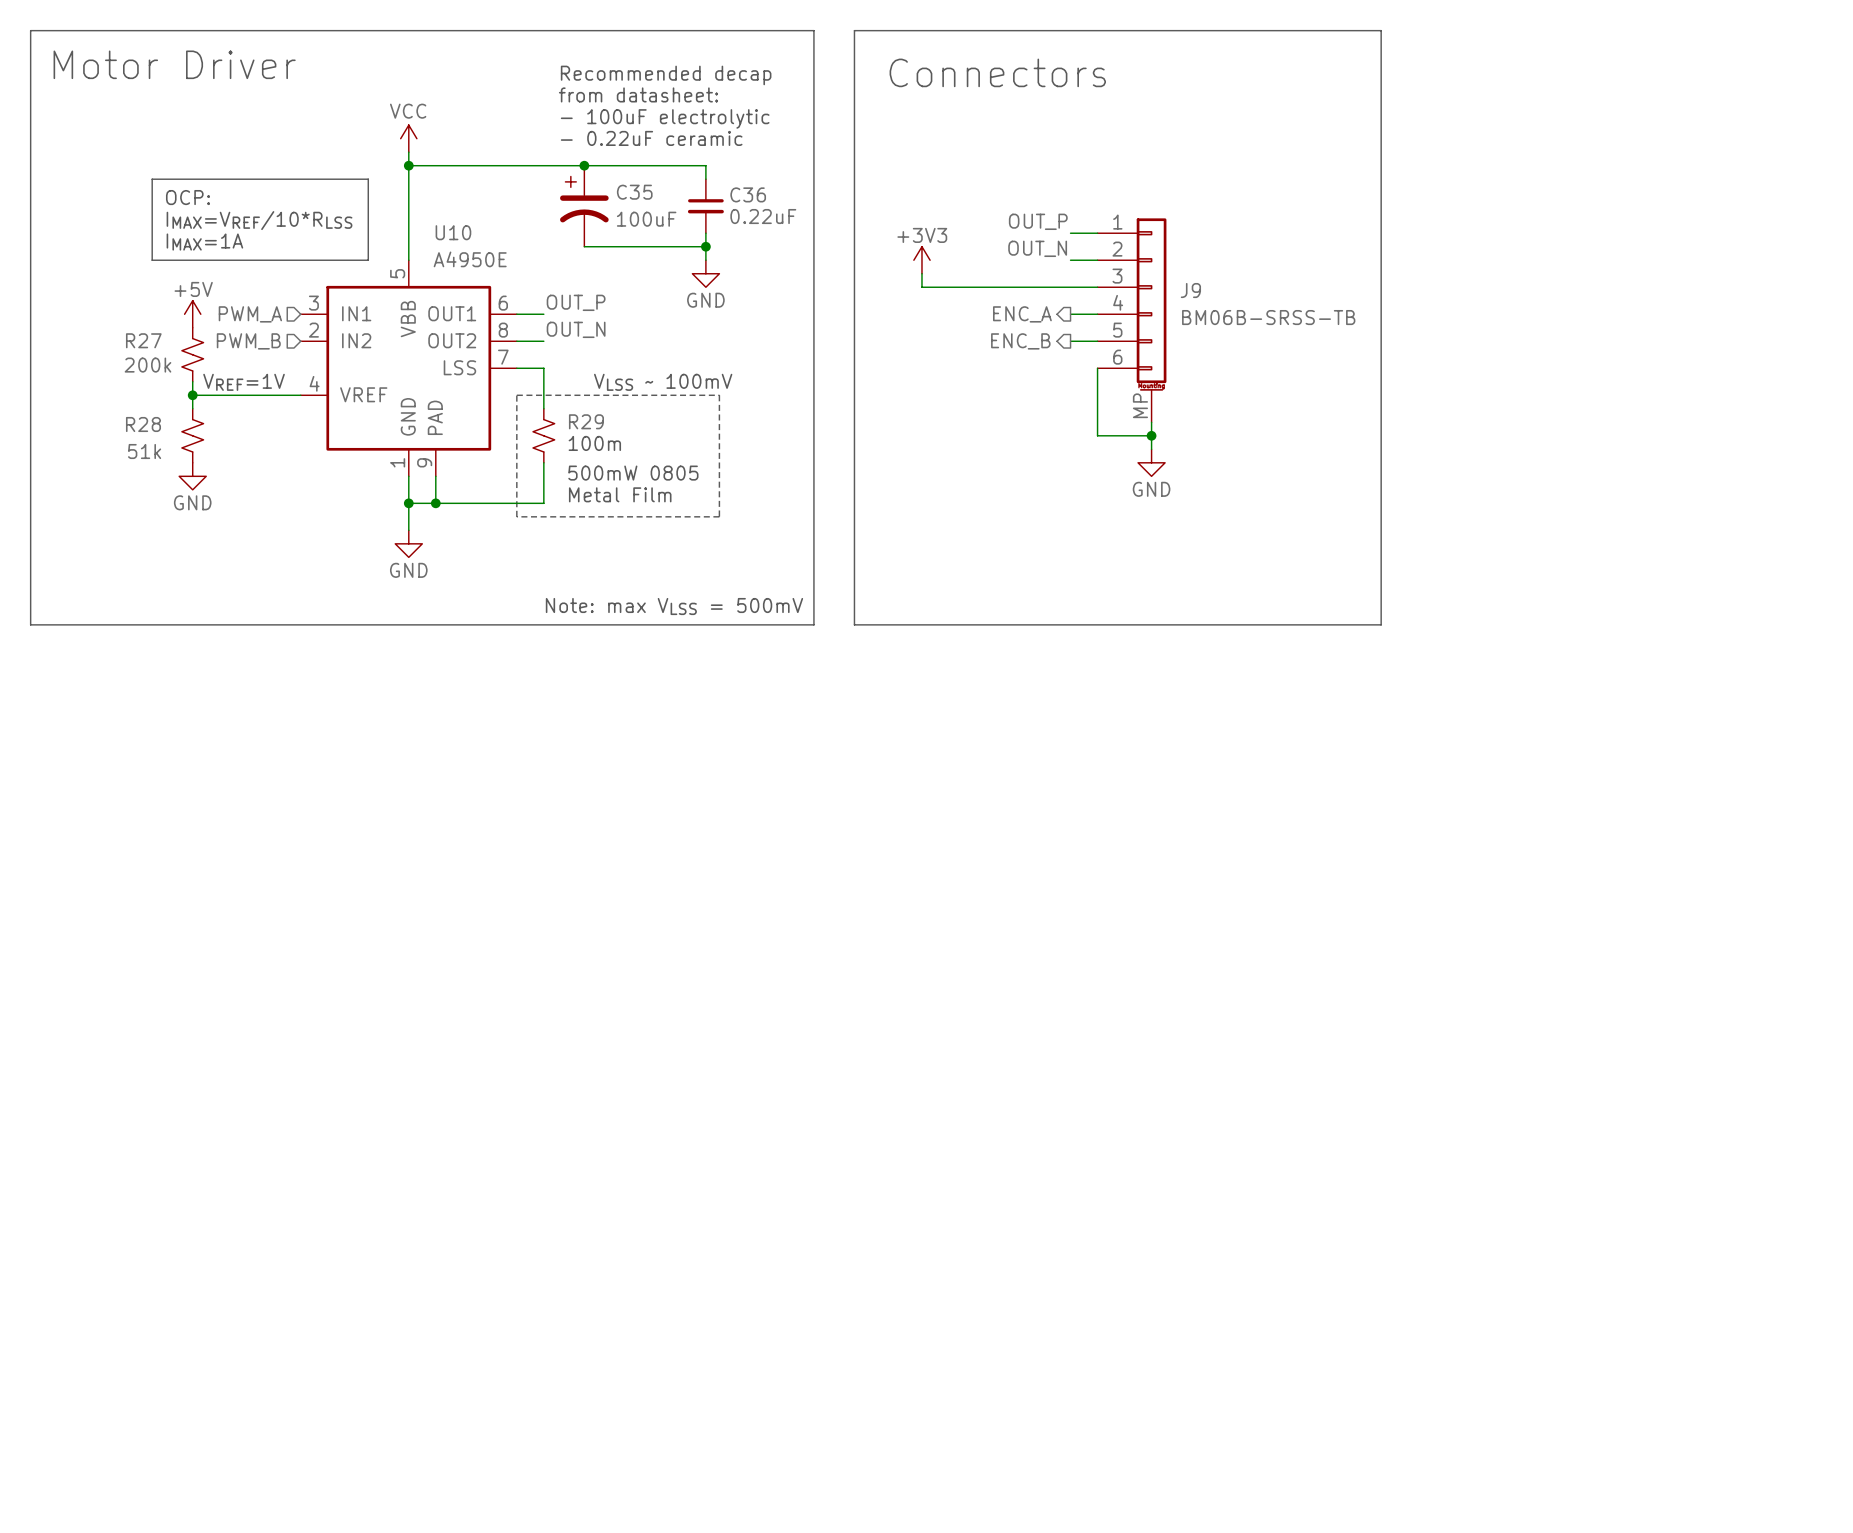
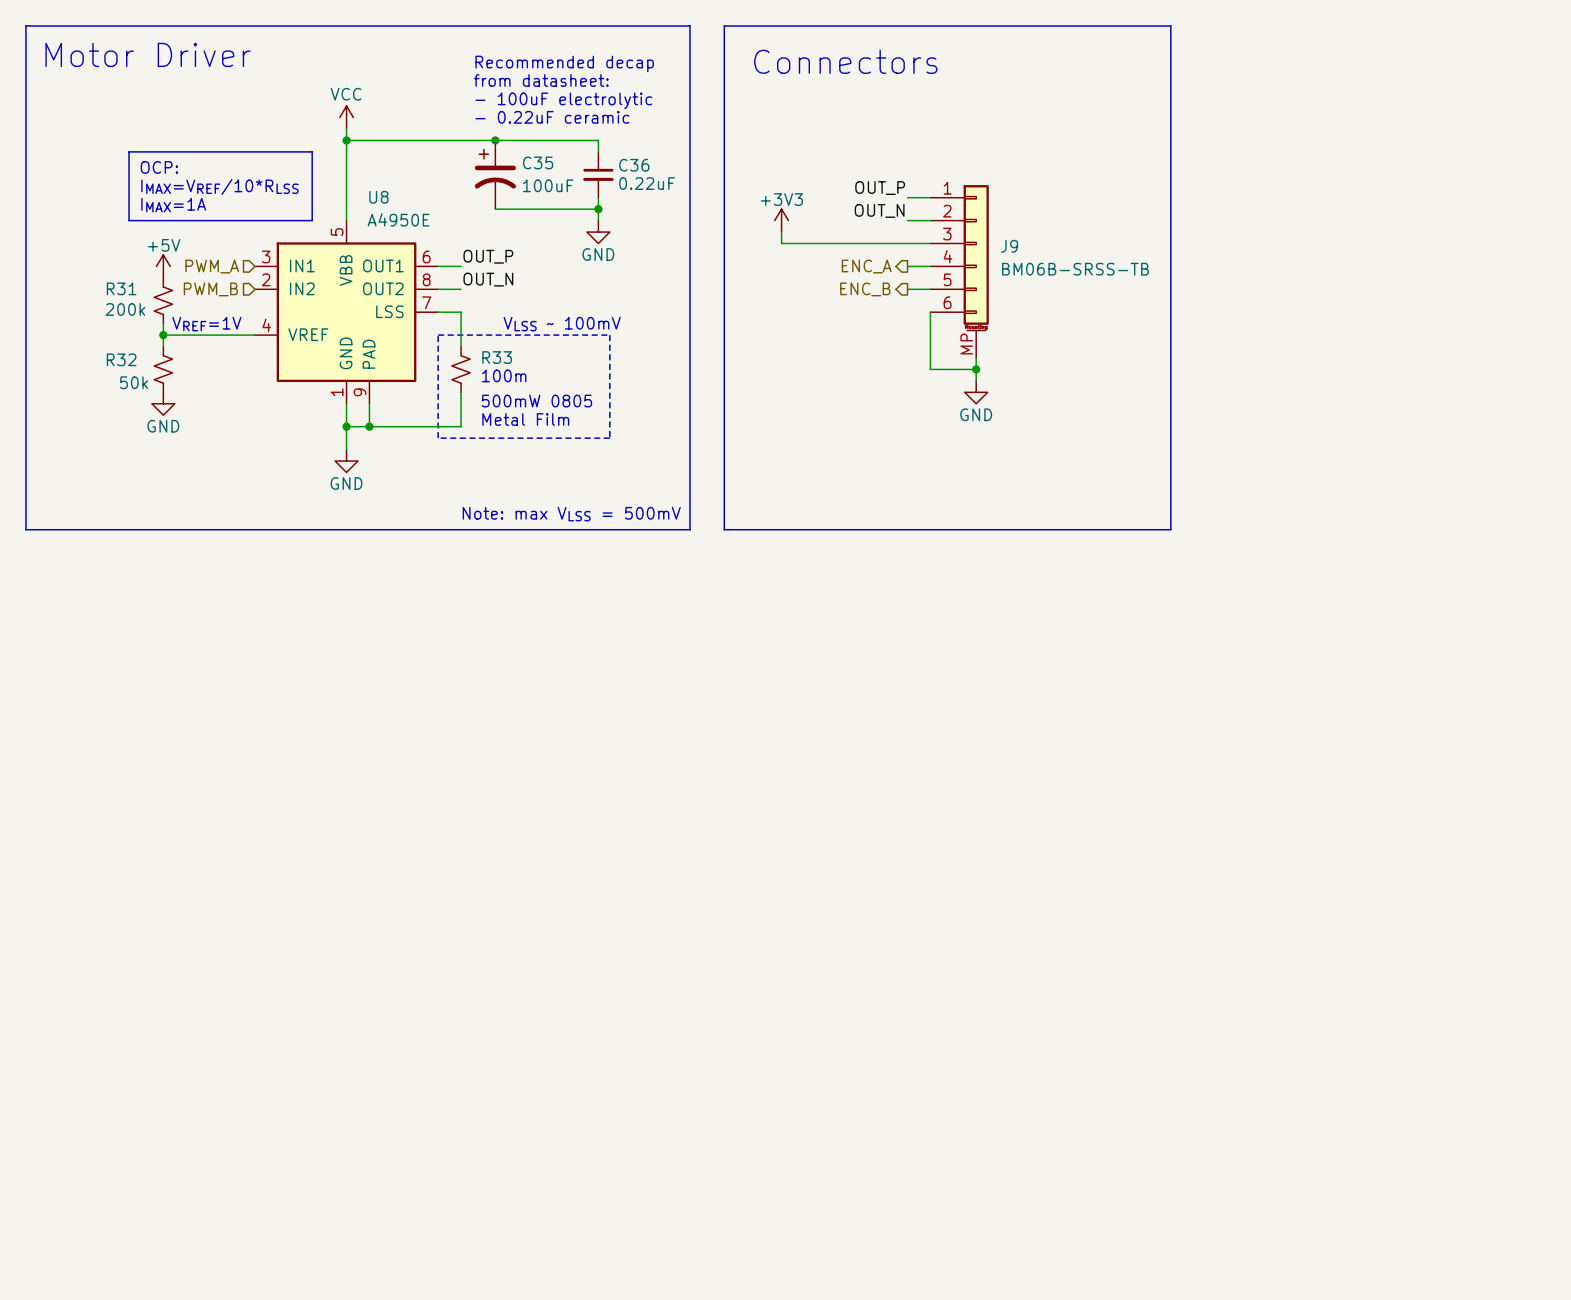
U10 name: U10 (453, 232) -> U8 (378, 197)
R27 name: R27 (143, 340) -> R31 (121, 288)
R29 name: R29 (586, 421) -> R33 (497, 357)
R28 name: R28 (143, 424) -> R32 (121, 359)
R28 value: 51k (144, 451) -> 50k (134, 382)

